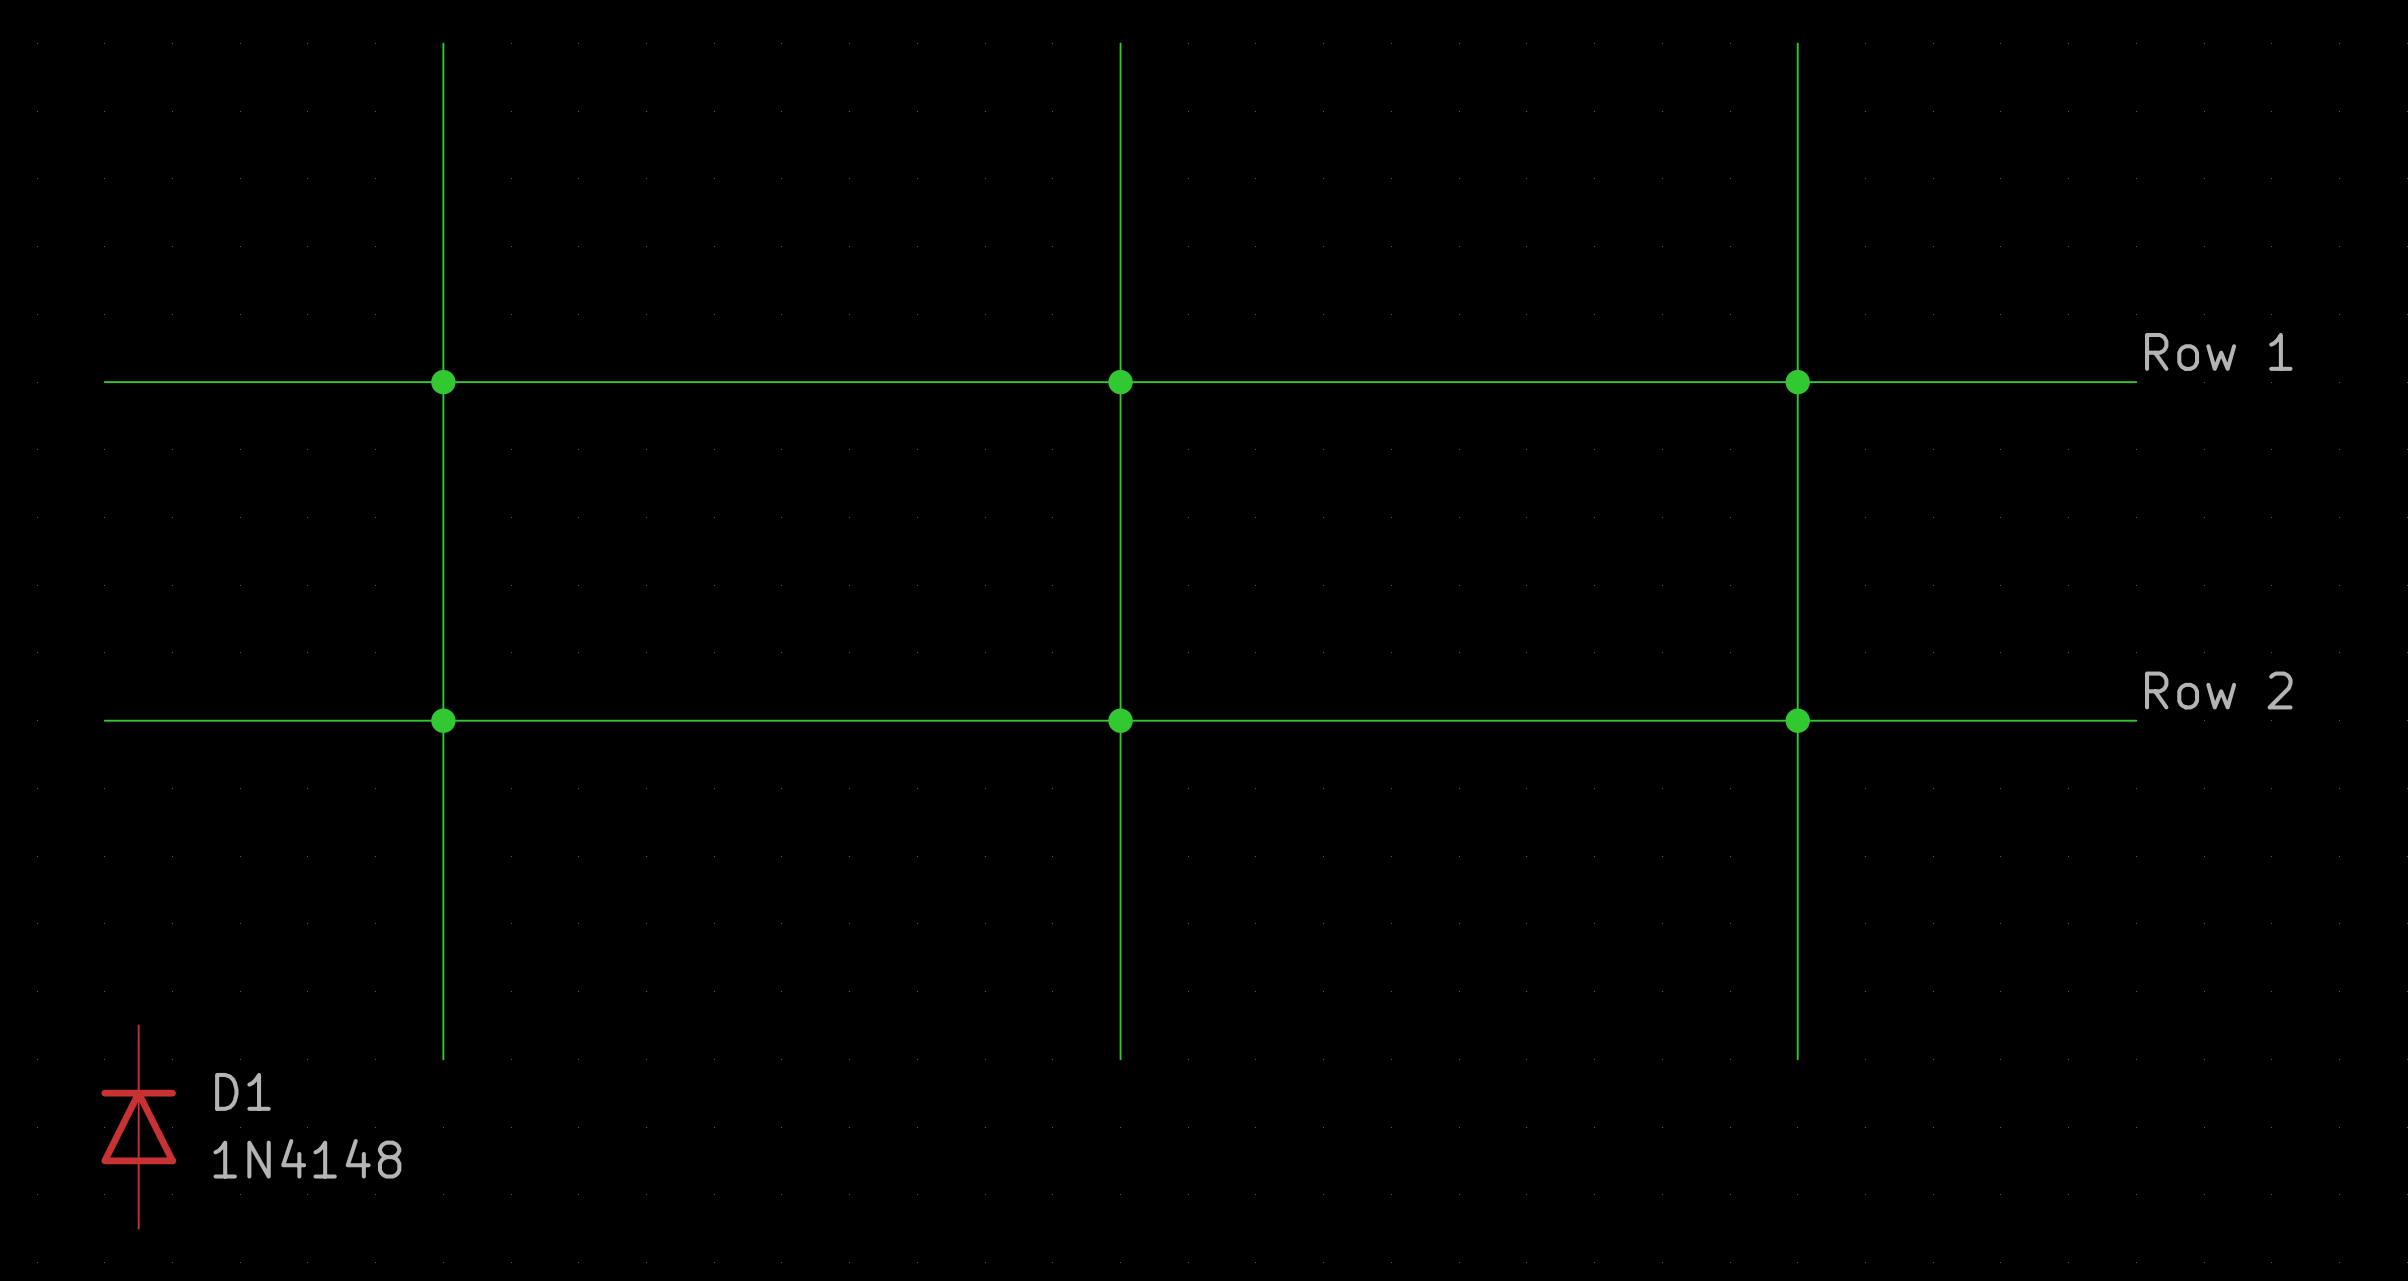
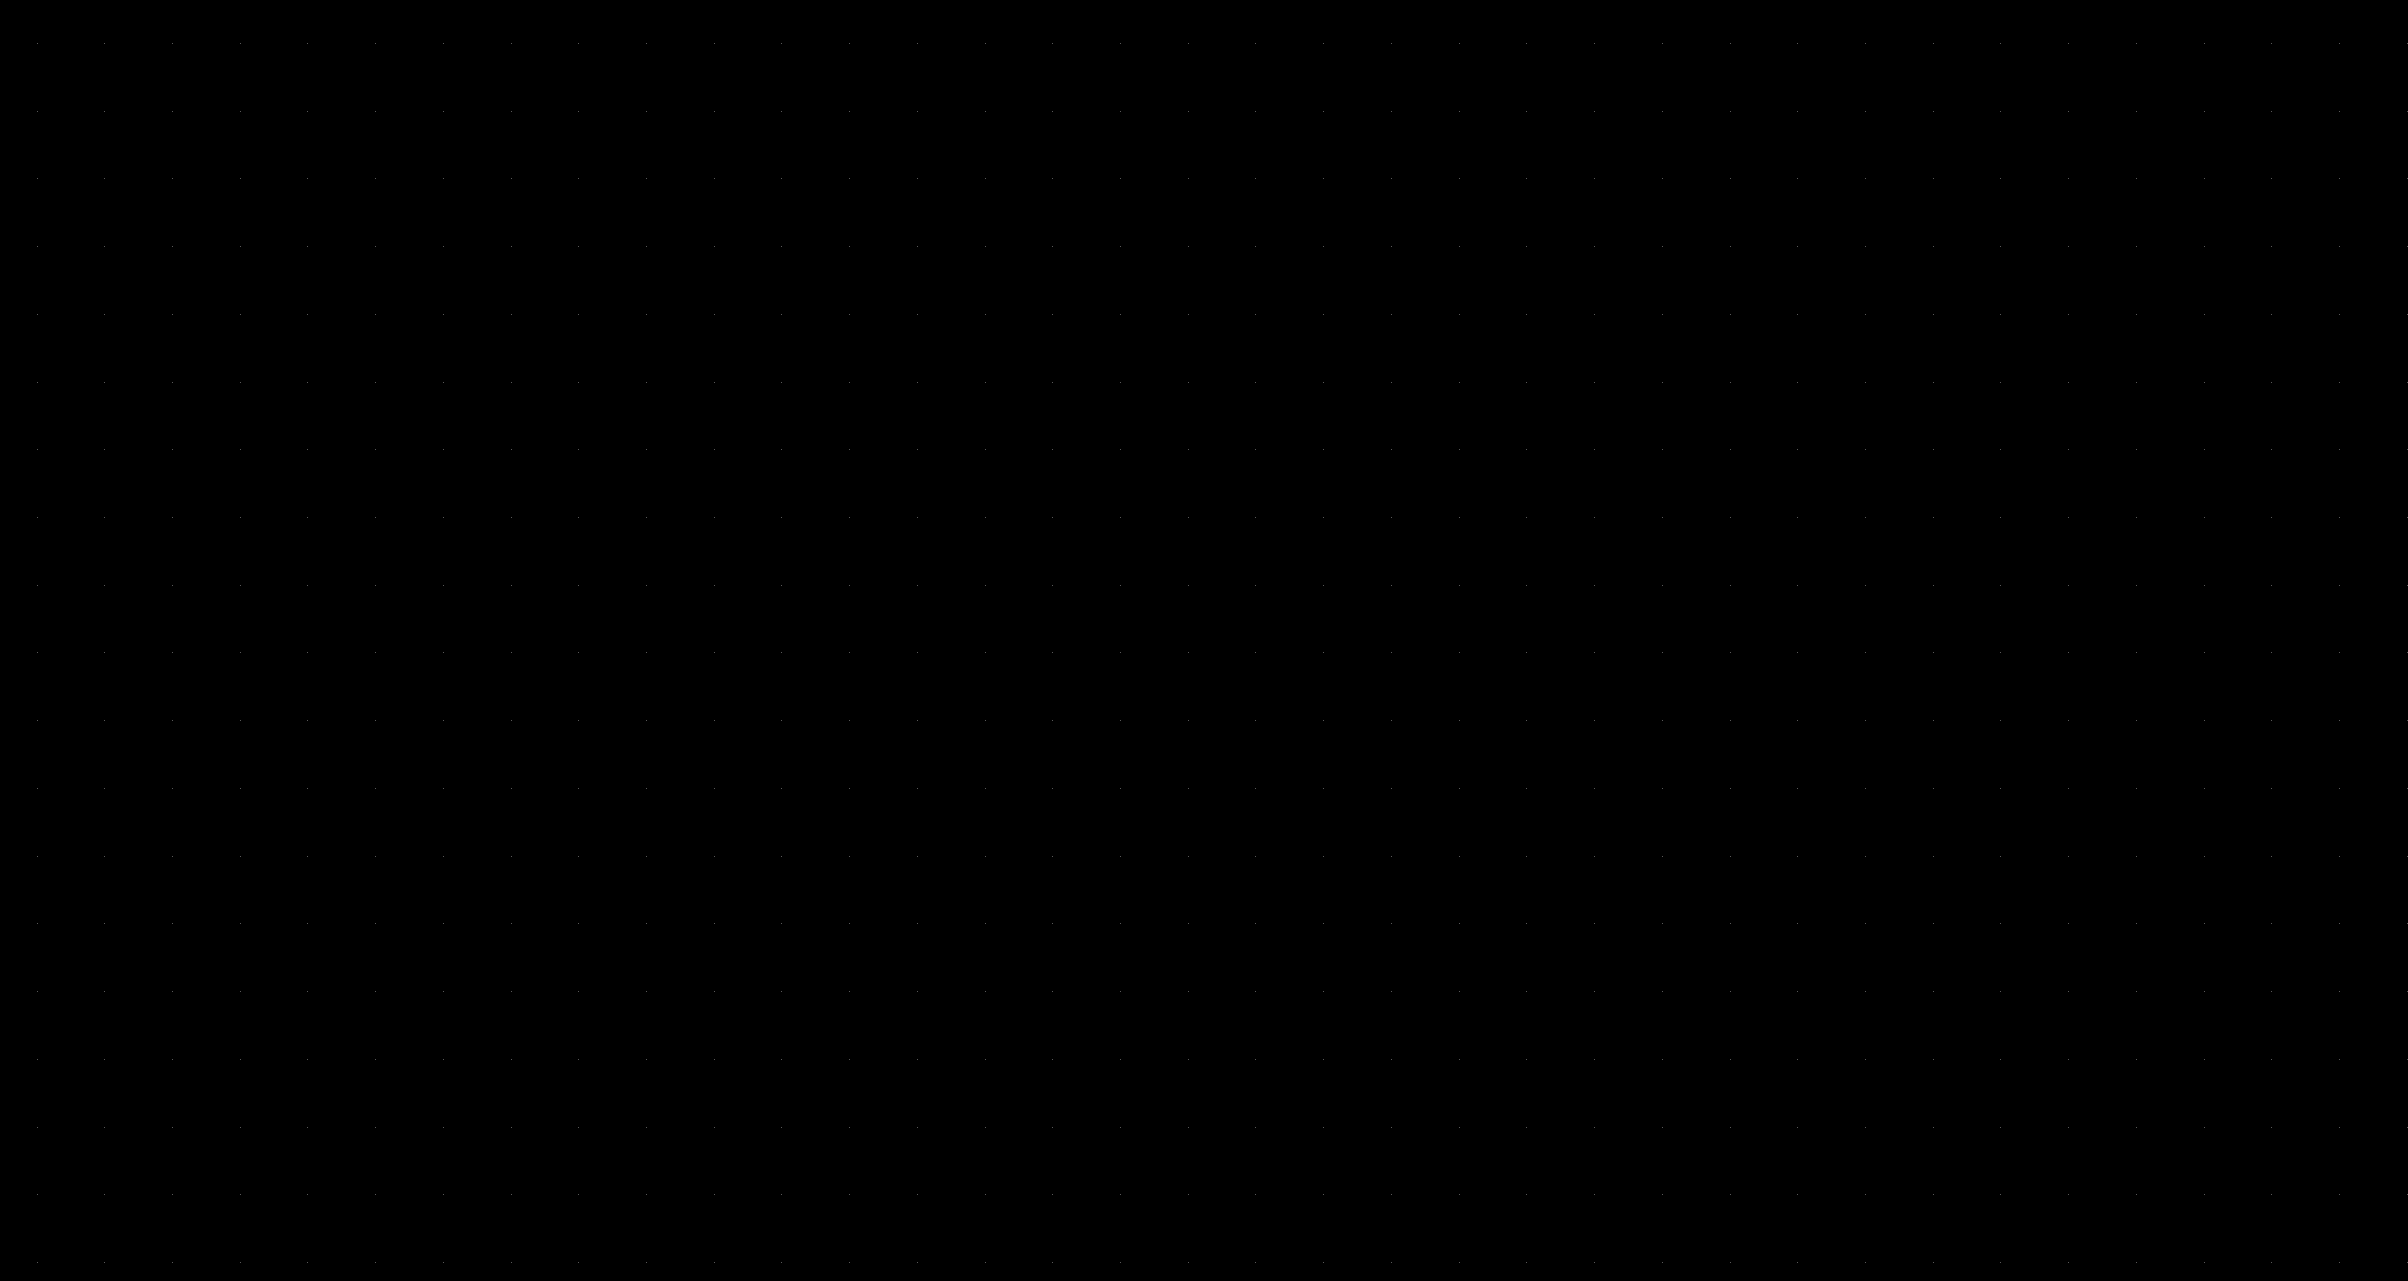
wire: (443, 43) (443, 1059) -> none
wire: (1120, 43) (1120, 1059) -> none
wire: (1797, 43) (1797, 1059) -> none
label: Row 1 (2218, 351) -> none
wire: (104, 382) (2136, 382) -> none
junction: (443, 382) -> none
junction: (1120, 382) -> none
junction: (1797, 382) -> none
label: Row 2 (2218, 690) -> none
wire: (104, 720) (2136, 720) -> none
junction: (443, 720) -> none
junction: (1120, 720) -> none
junction: (1797, 720) -> none
D1: 1N4148 (138, 1127) -> none

